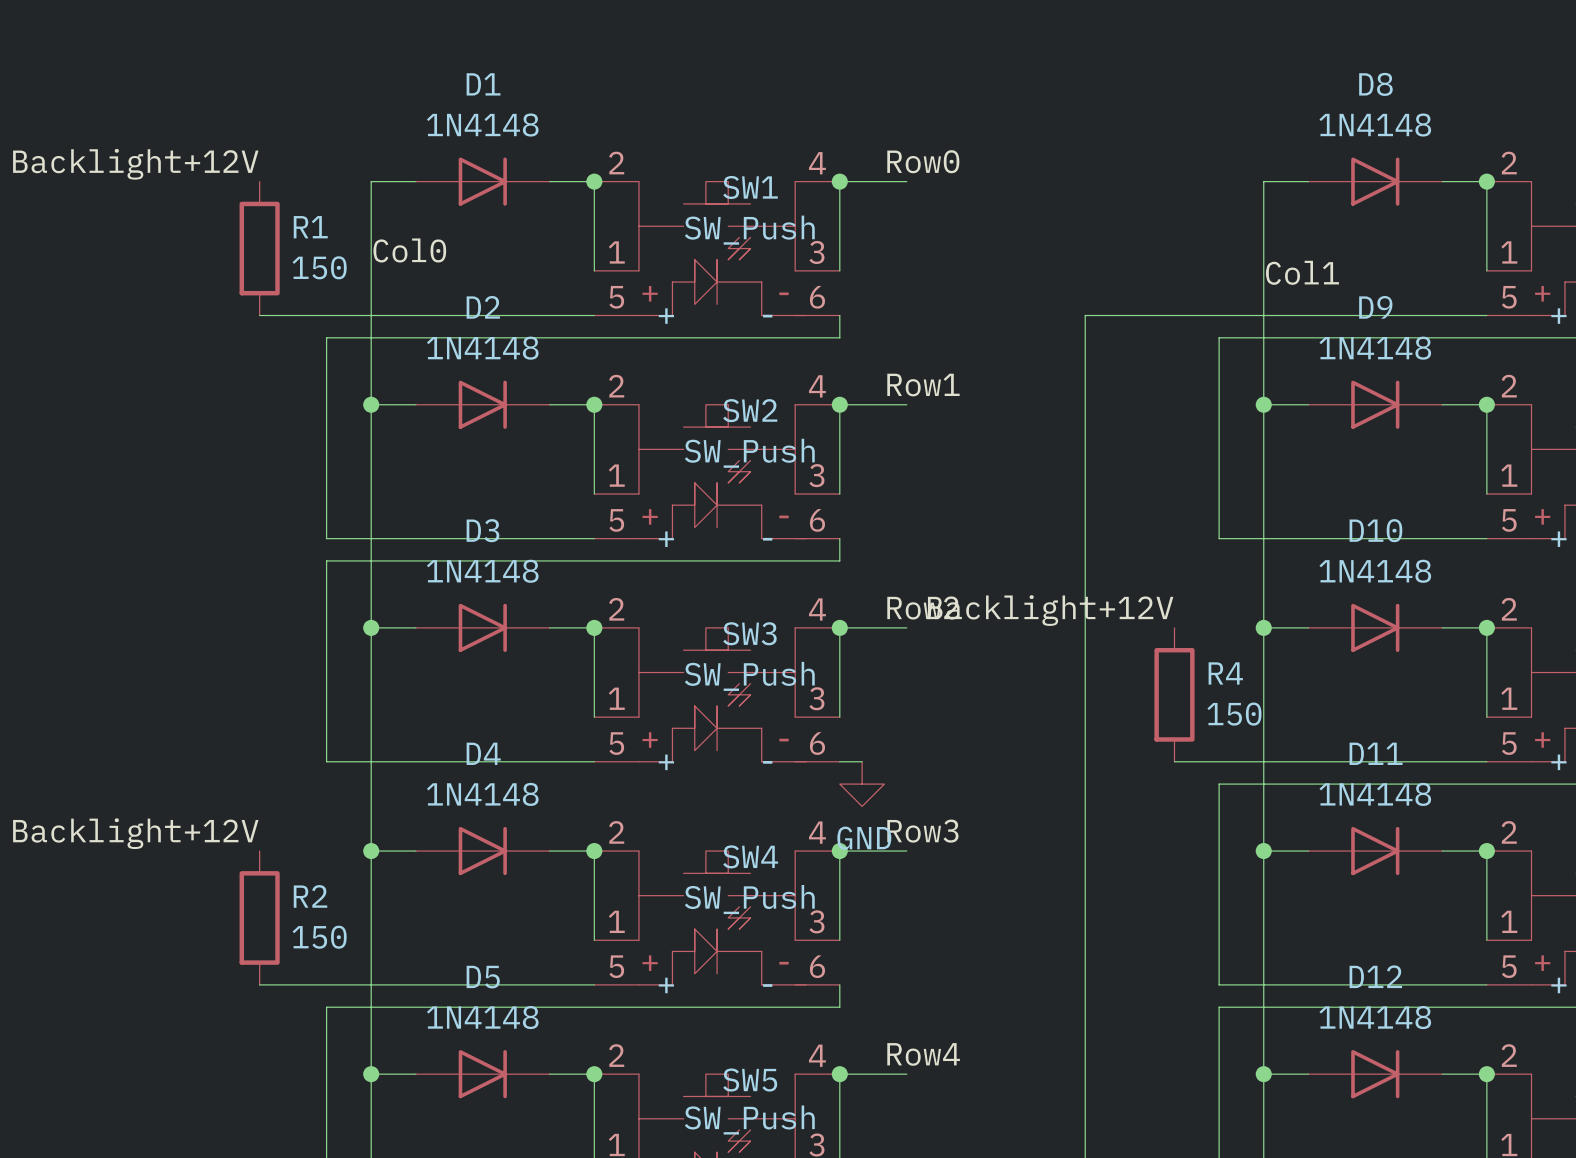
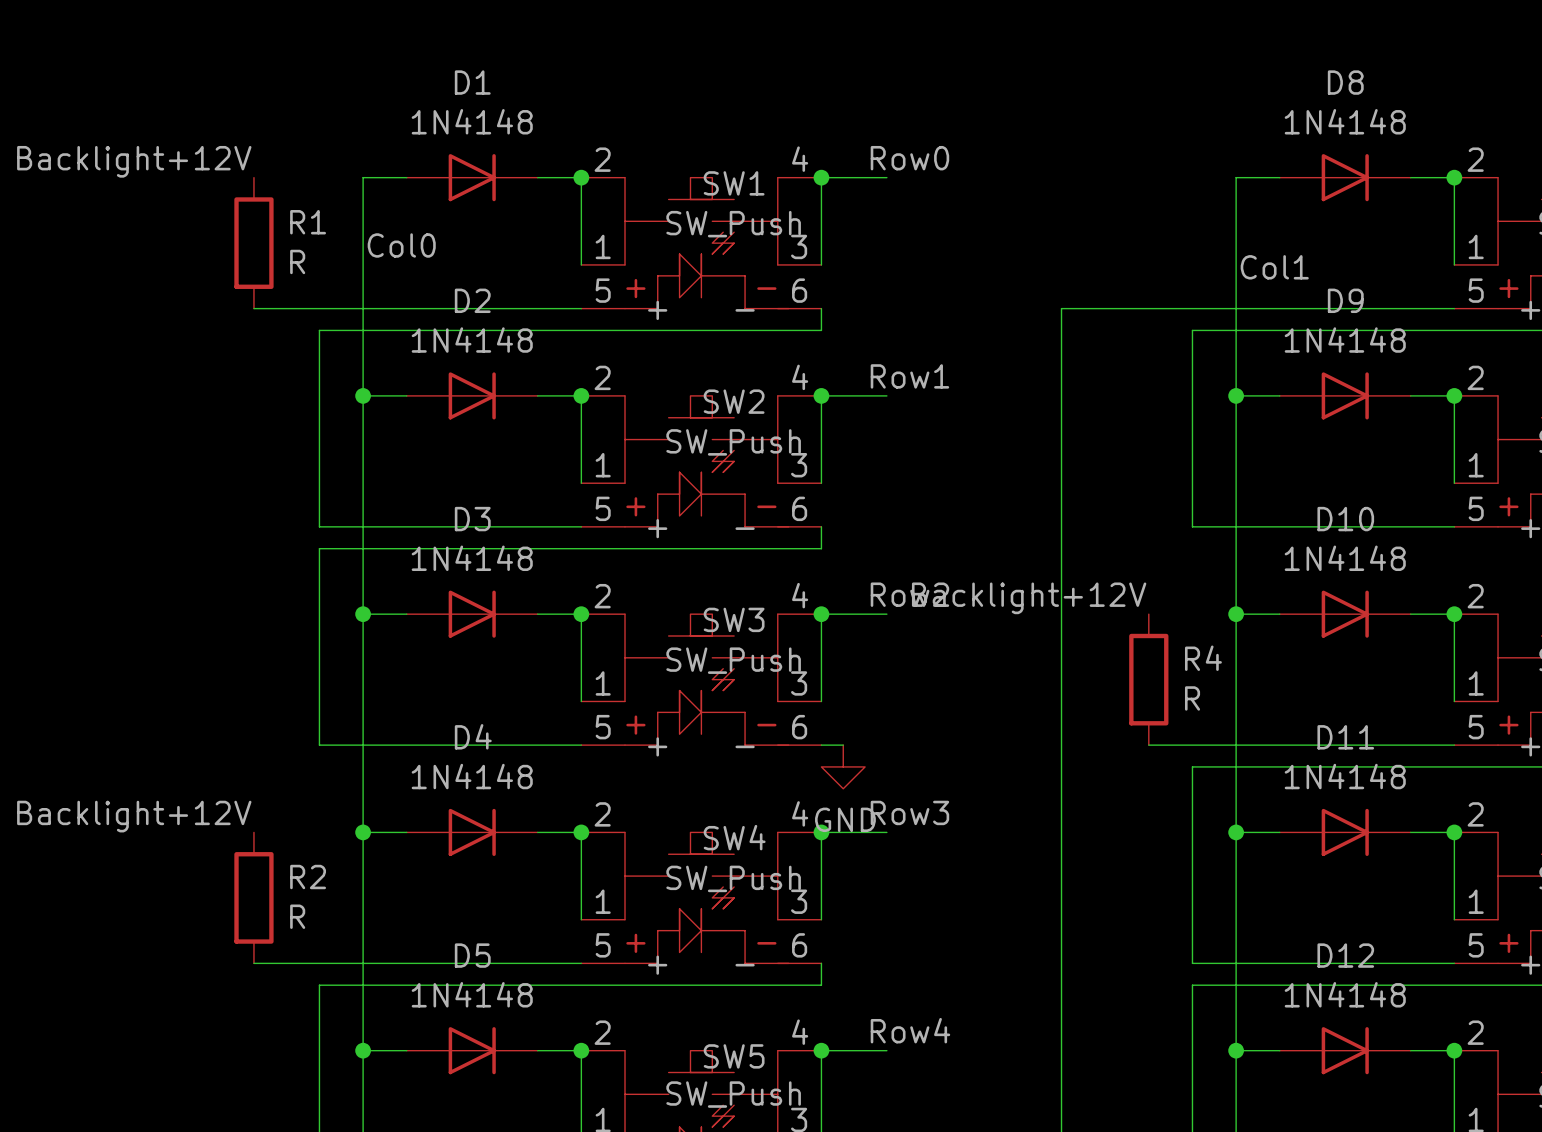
R1 value: 150 (319, 267) -> R (297, 261)
R4 value: 150 (1234, 714) -> R (1192, 698)
R2 value: 150 (319, 937) -> R (297, 916)

